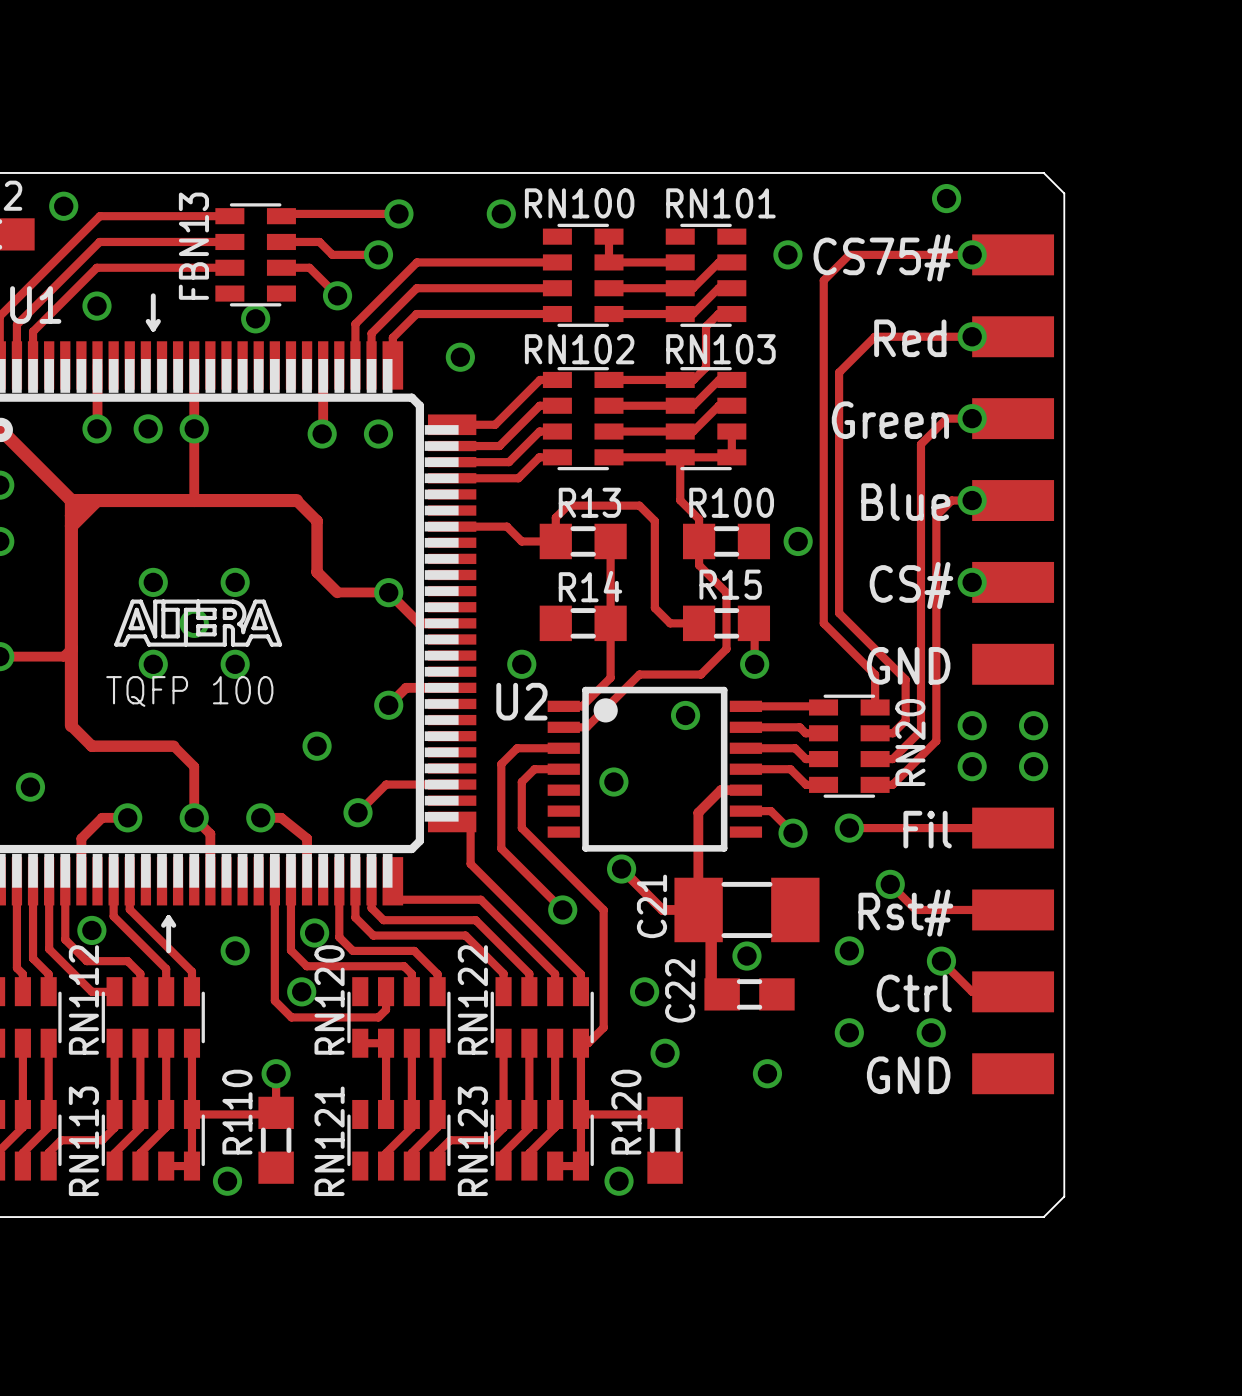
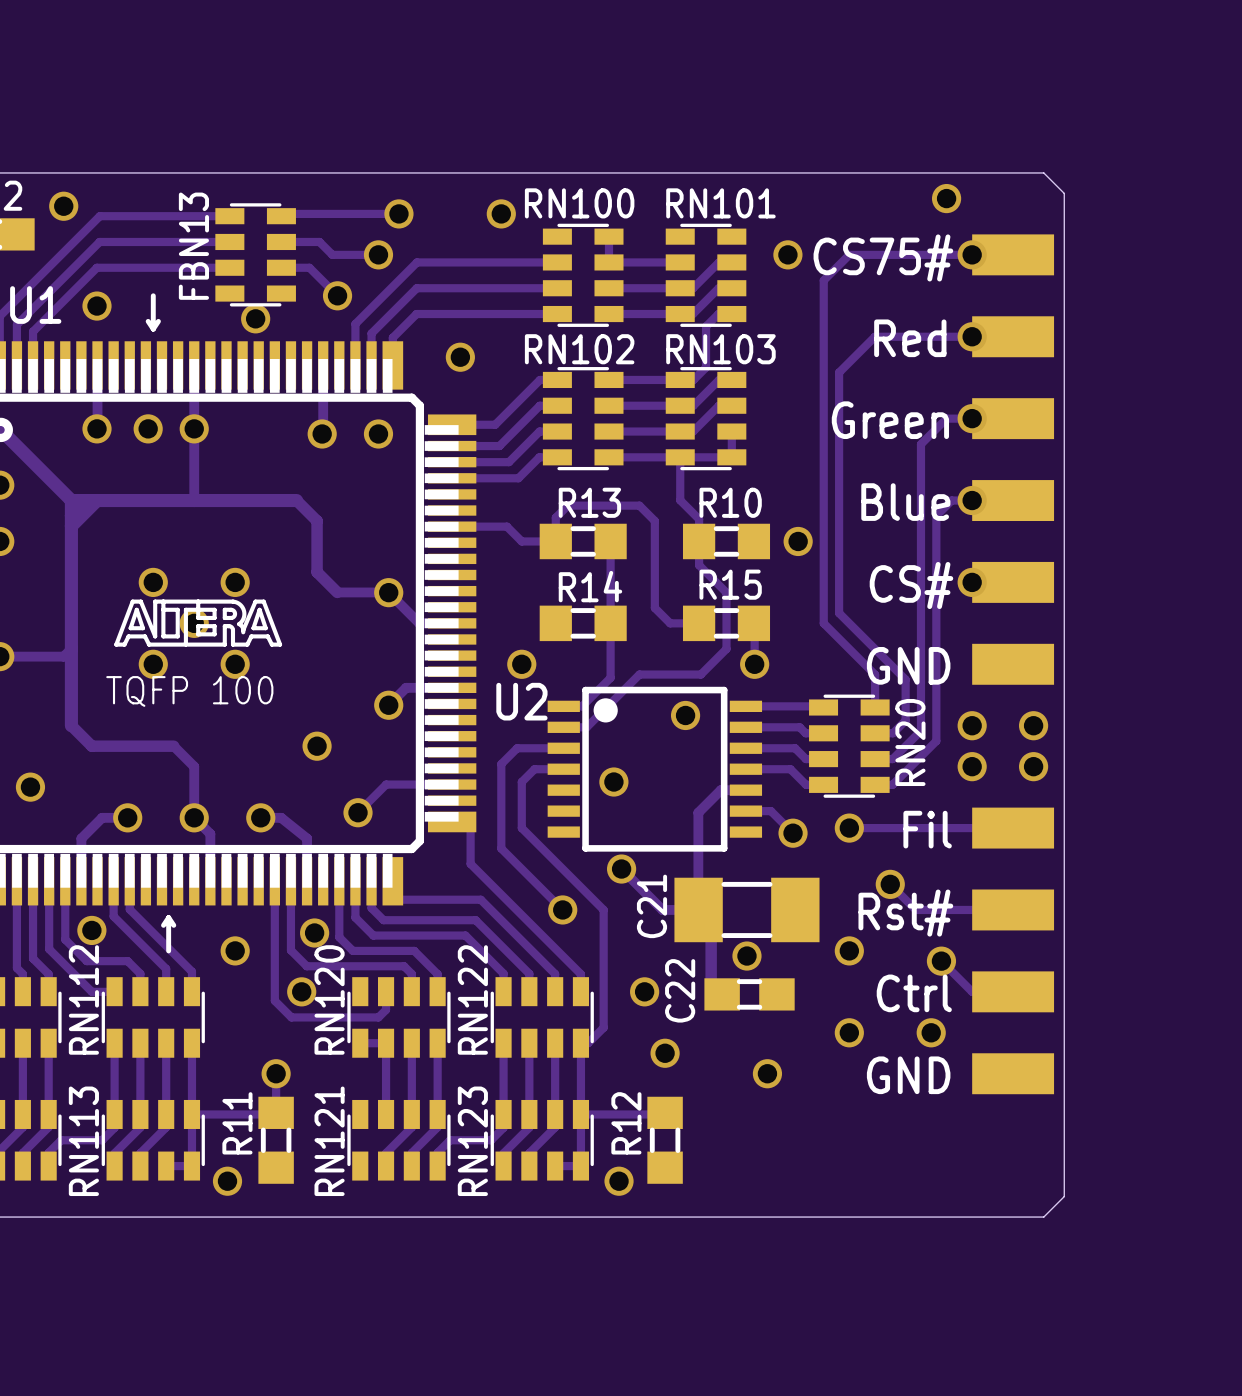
text: R100 (731, 502) -> R10 (730, 502)
text: R110 (237, 1112) -> R11 (237, 1123)
text: R120 (626, 1112) -> R12 (626, 1123)

